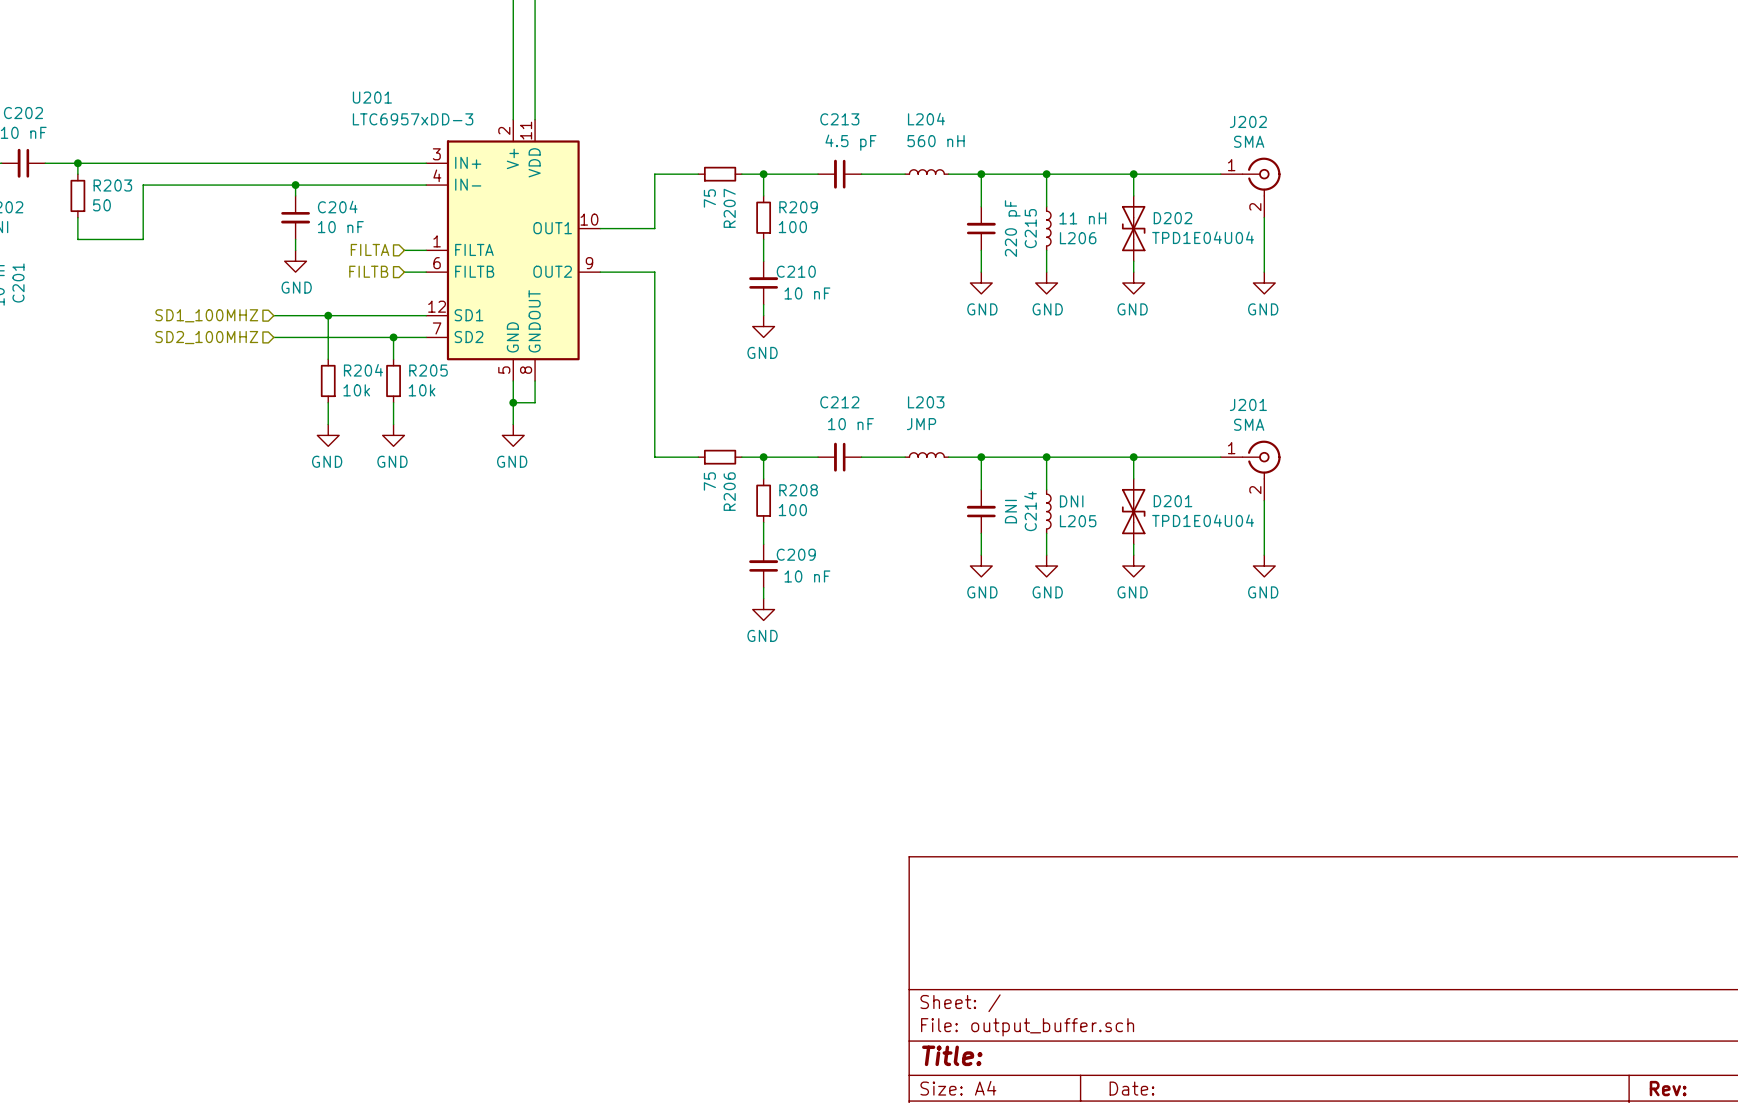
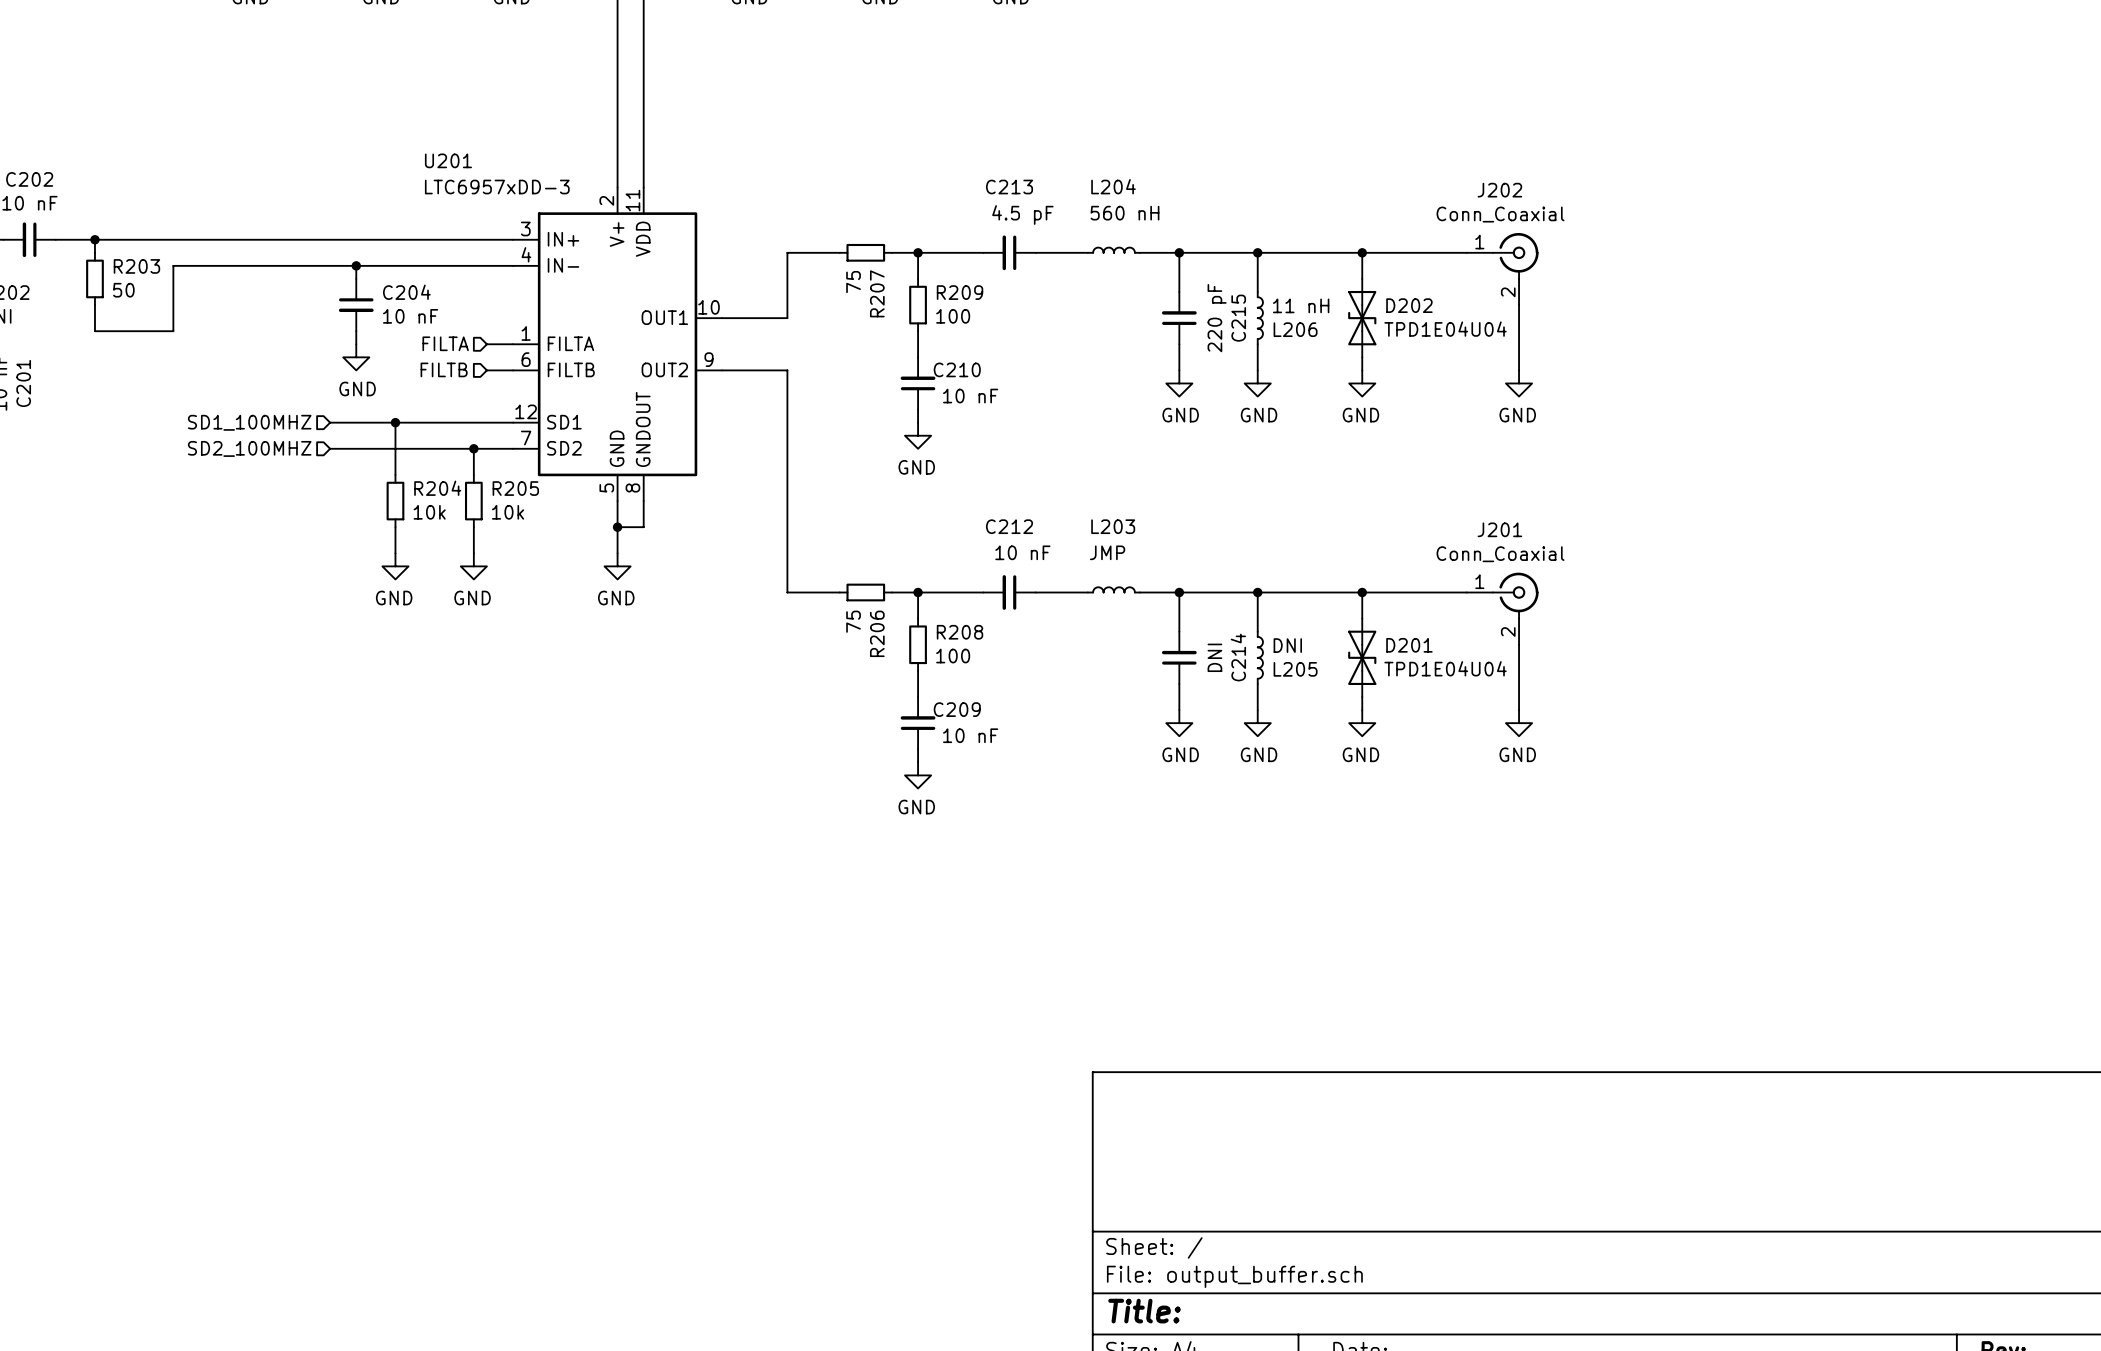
J202 value: SMA (1249, 141) -> Conn_Coaxial (1500, 214)
J201 value: SMA (1249, 424) -> Conn_Coaxial (1500, 554)

